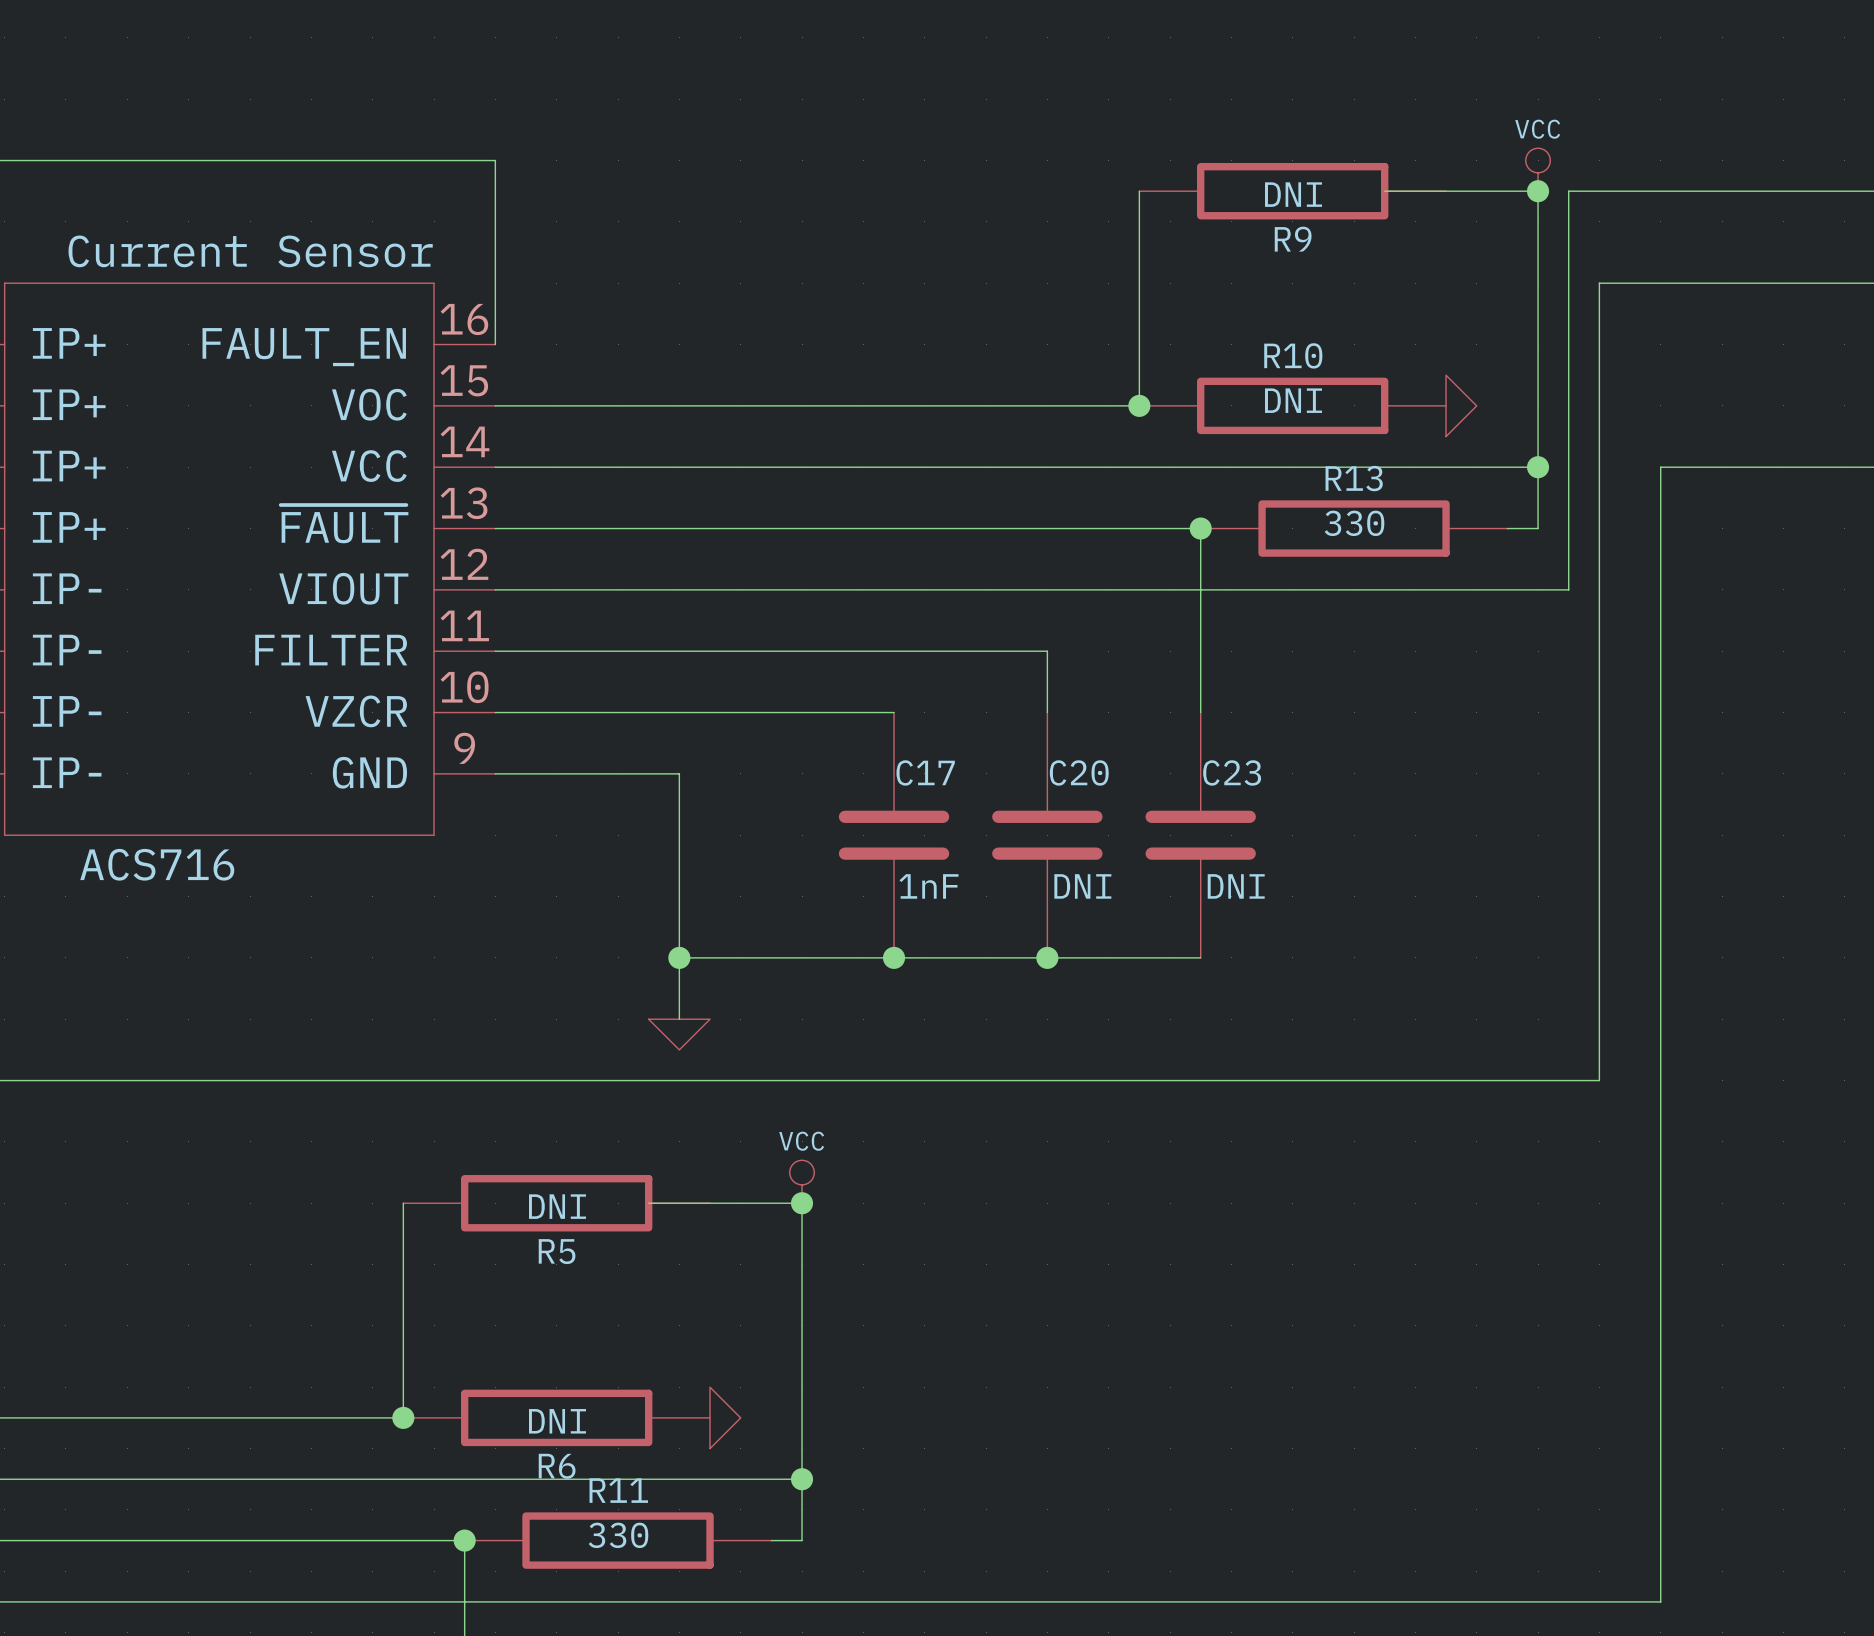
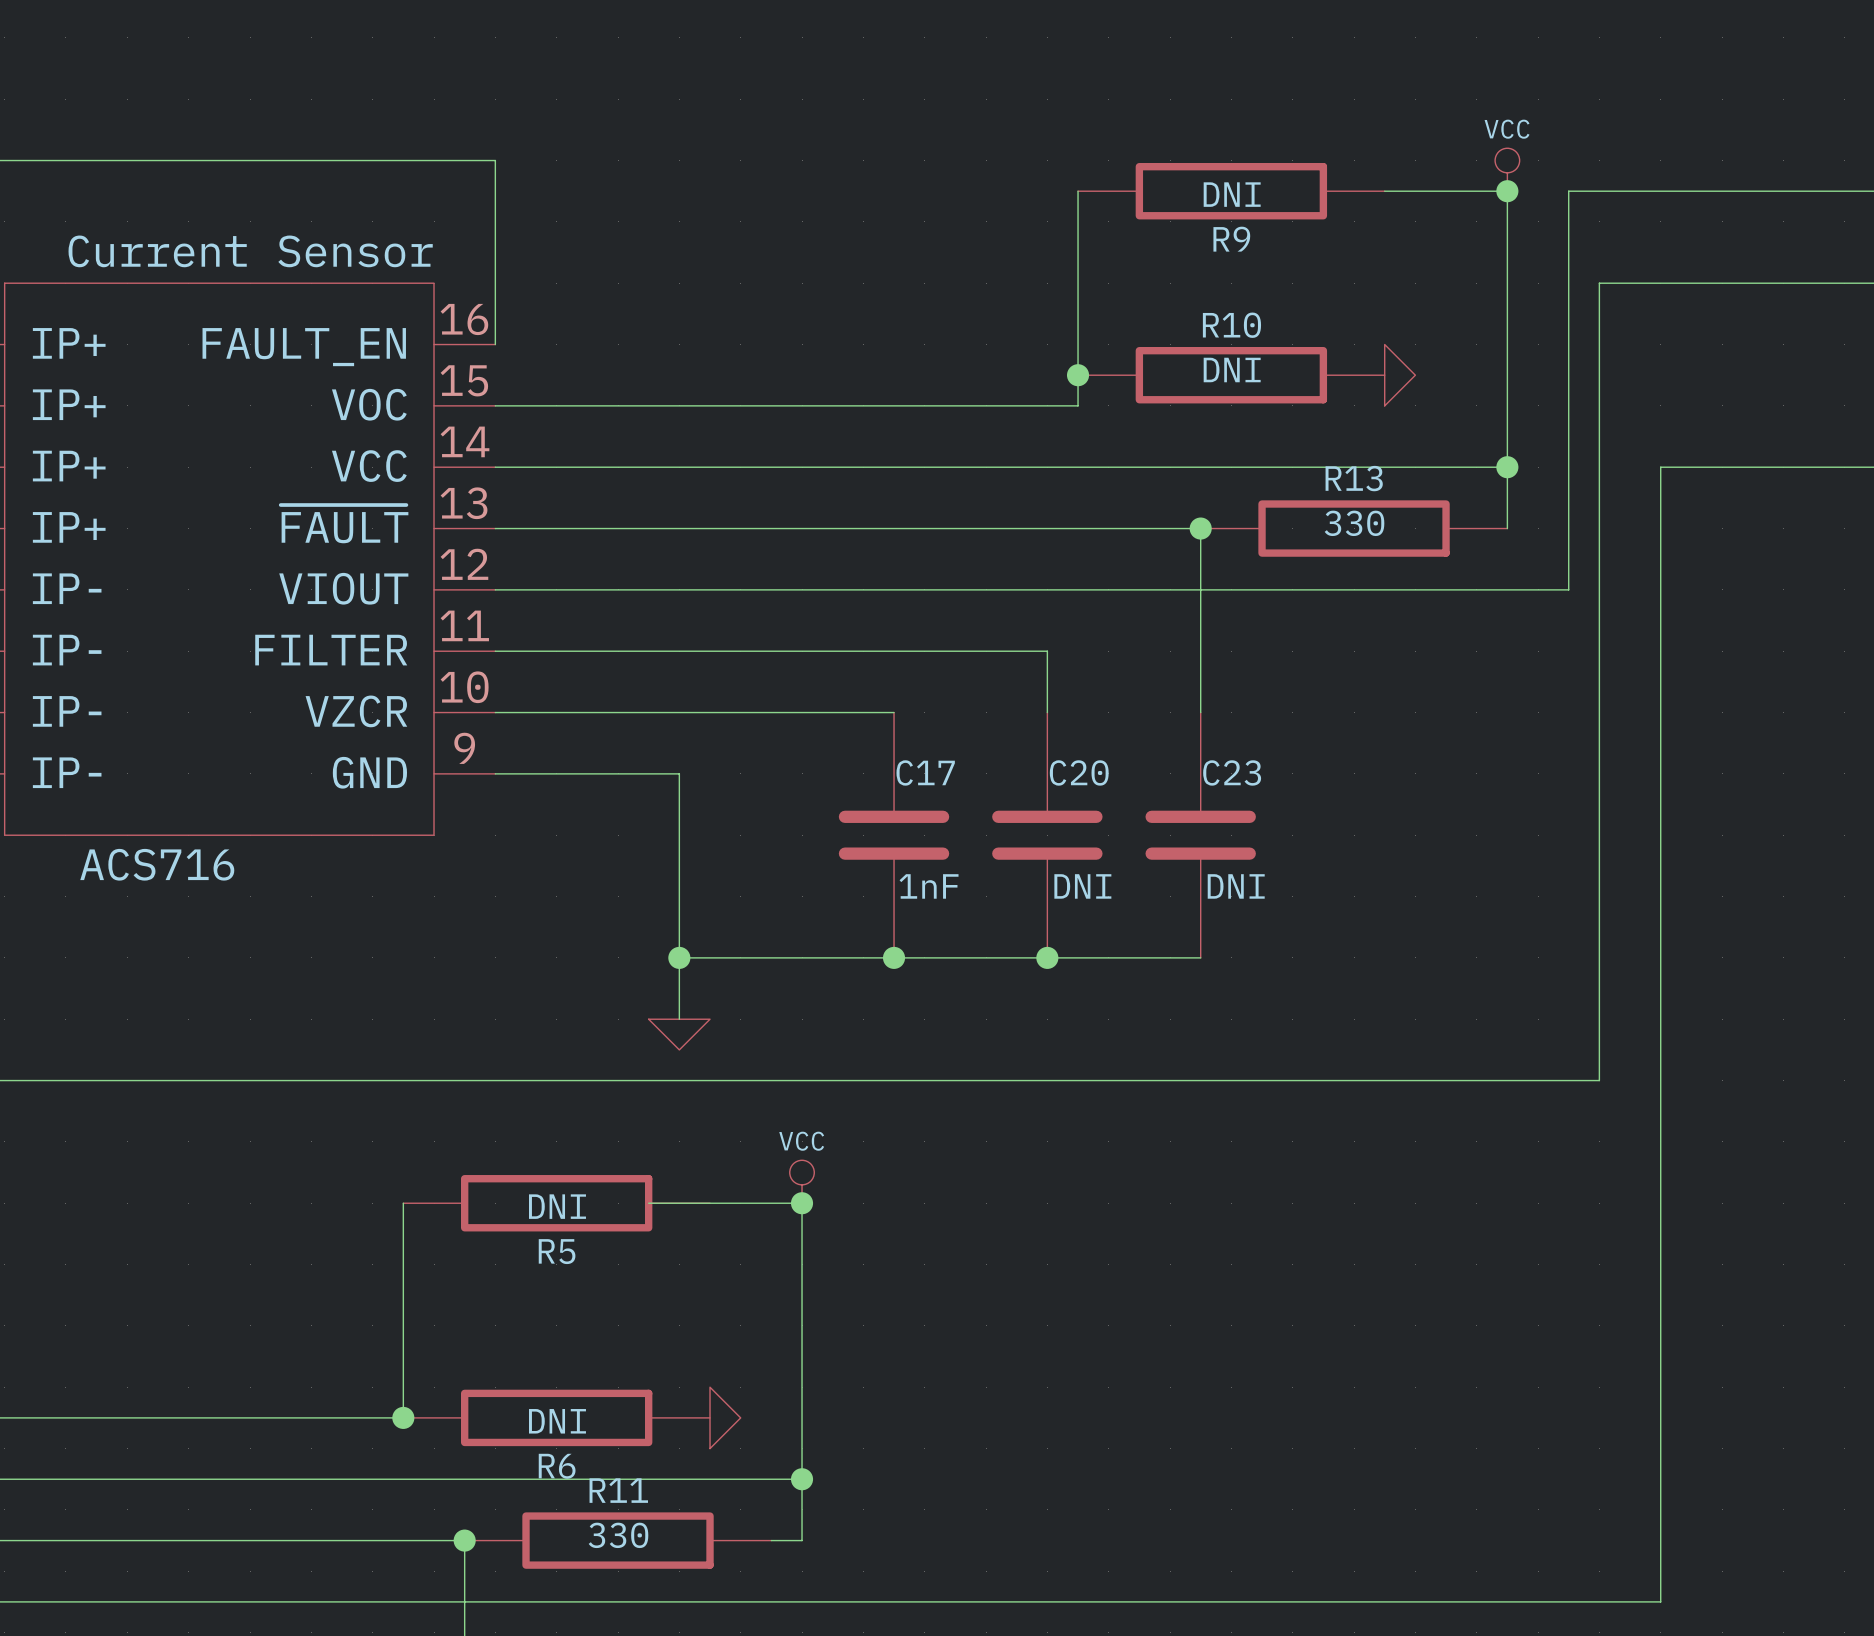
power symbol position: VCC (1538, 169) -> VCC (1507, 169)
wire: (1139, 191) (1139, 405) (1078, 405) -> (1078, 191) (1078, 405)
R9 position: (1292, 191) -> (1231, 191)
wire: (1507, 191) (1538, 191) (1538, 528) (1507, 528) -> (1507, 191) (1507, 528)
junction position: (1538, 191) -> (1507, 191)
junction position: (1139, 405) -> (1078, 375)
R10 position: (1292, 405) -> (1231, 375)
power symbol position: (1461, 405) -> (1400, 375)
wire: (1507, 467) (1538, 467) -> none
junction position: (1538, 467) -> (1507, 467)

